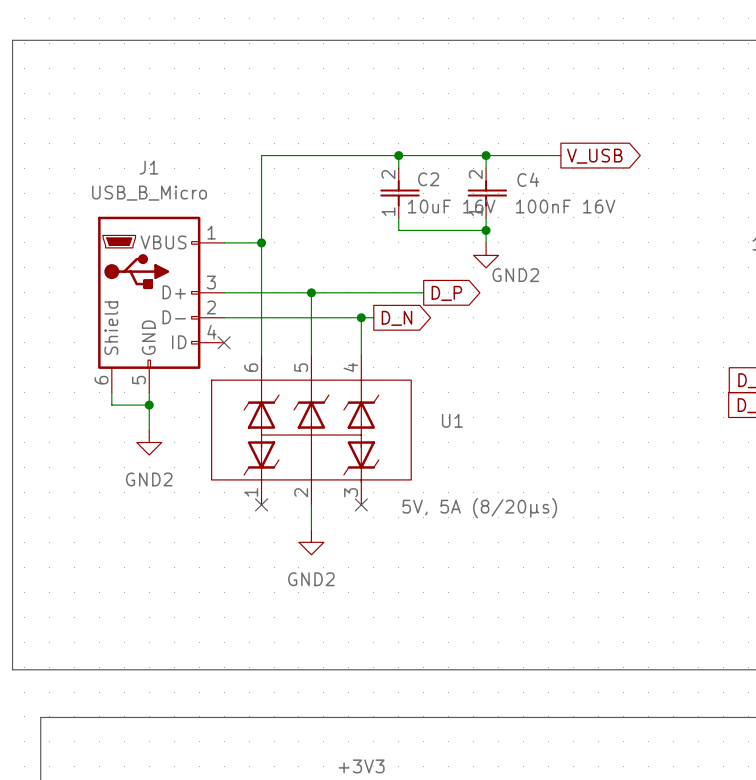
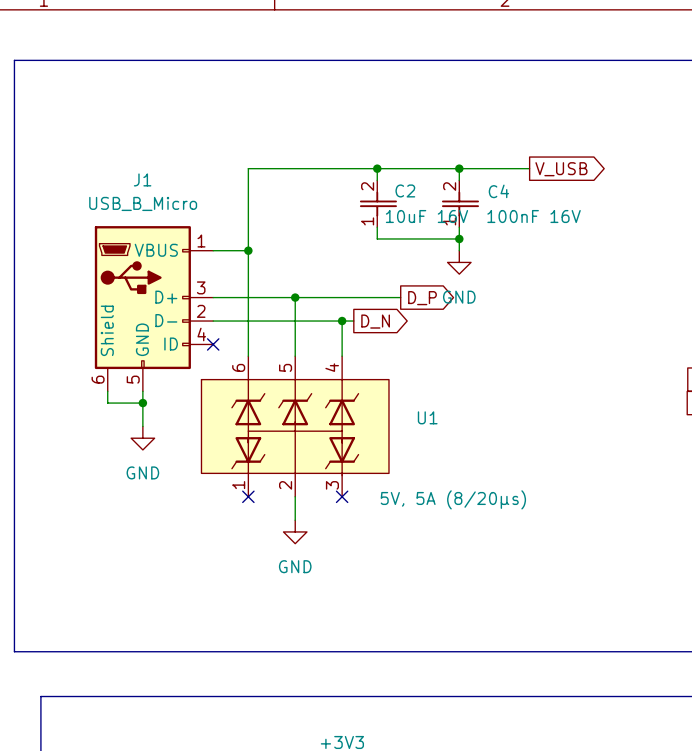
power symbol: GND2 (486, 255) -> GND (459, 262)
power symbol: GND2 (149, 442) -> GND (142, 438)
power symbol: GND2 (311, 542) -> GND (295, 531)

